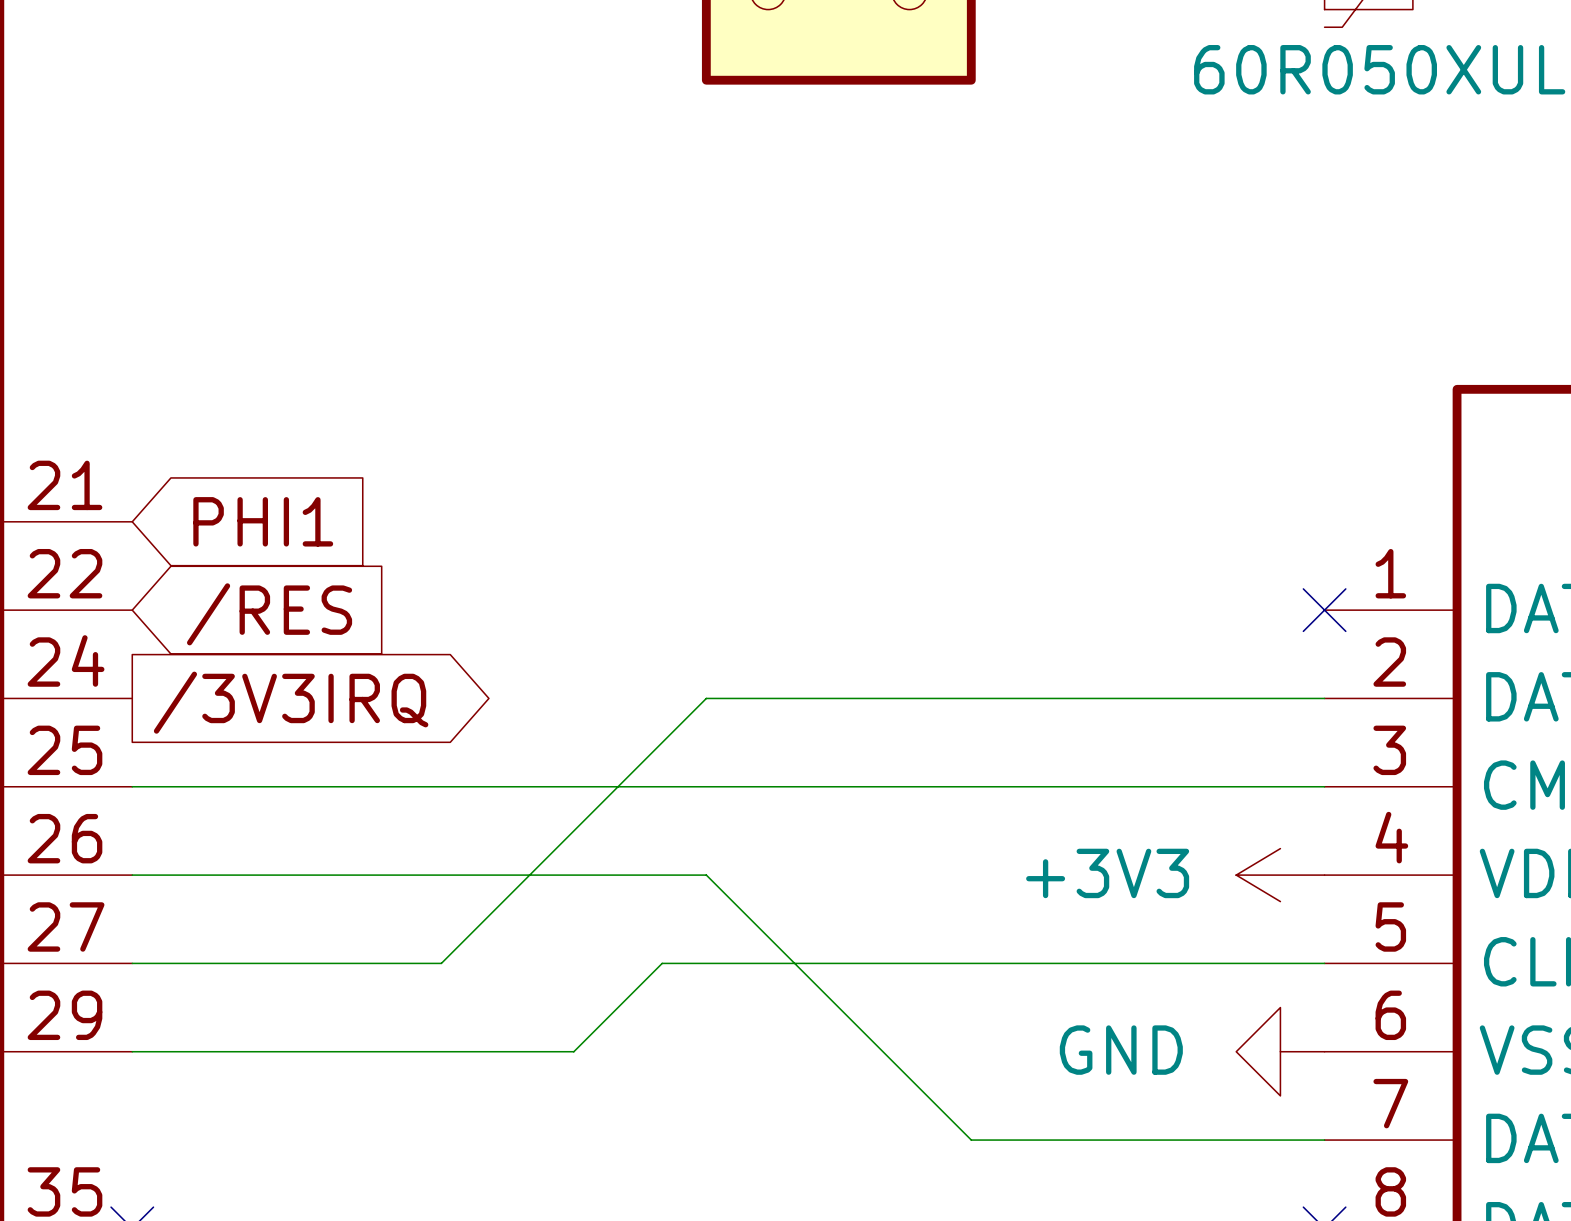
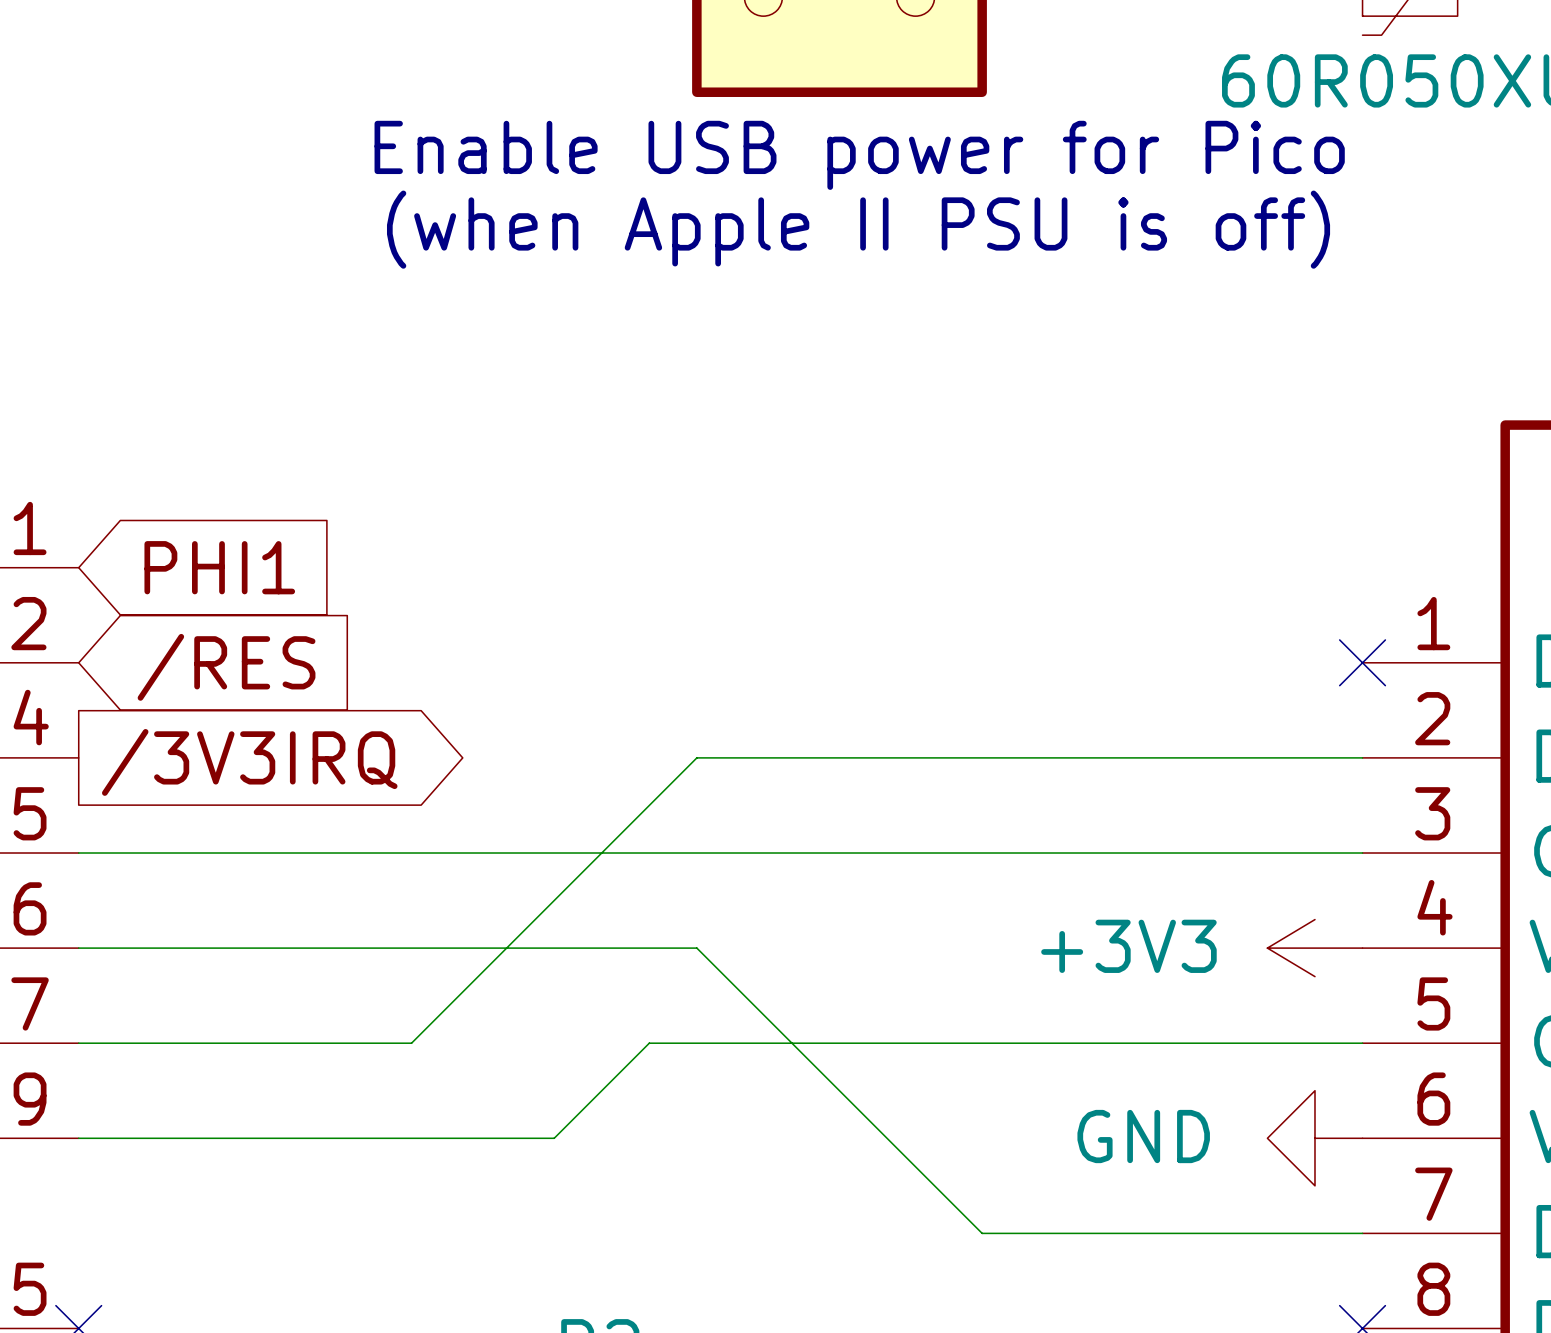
text: none -> Enable USB power for Pico (859, 155)
text: none -> (when Apple II PSU is off) (858, 229)

